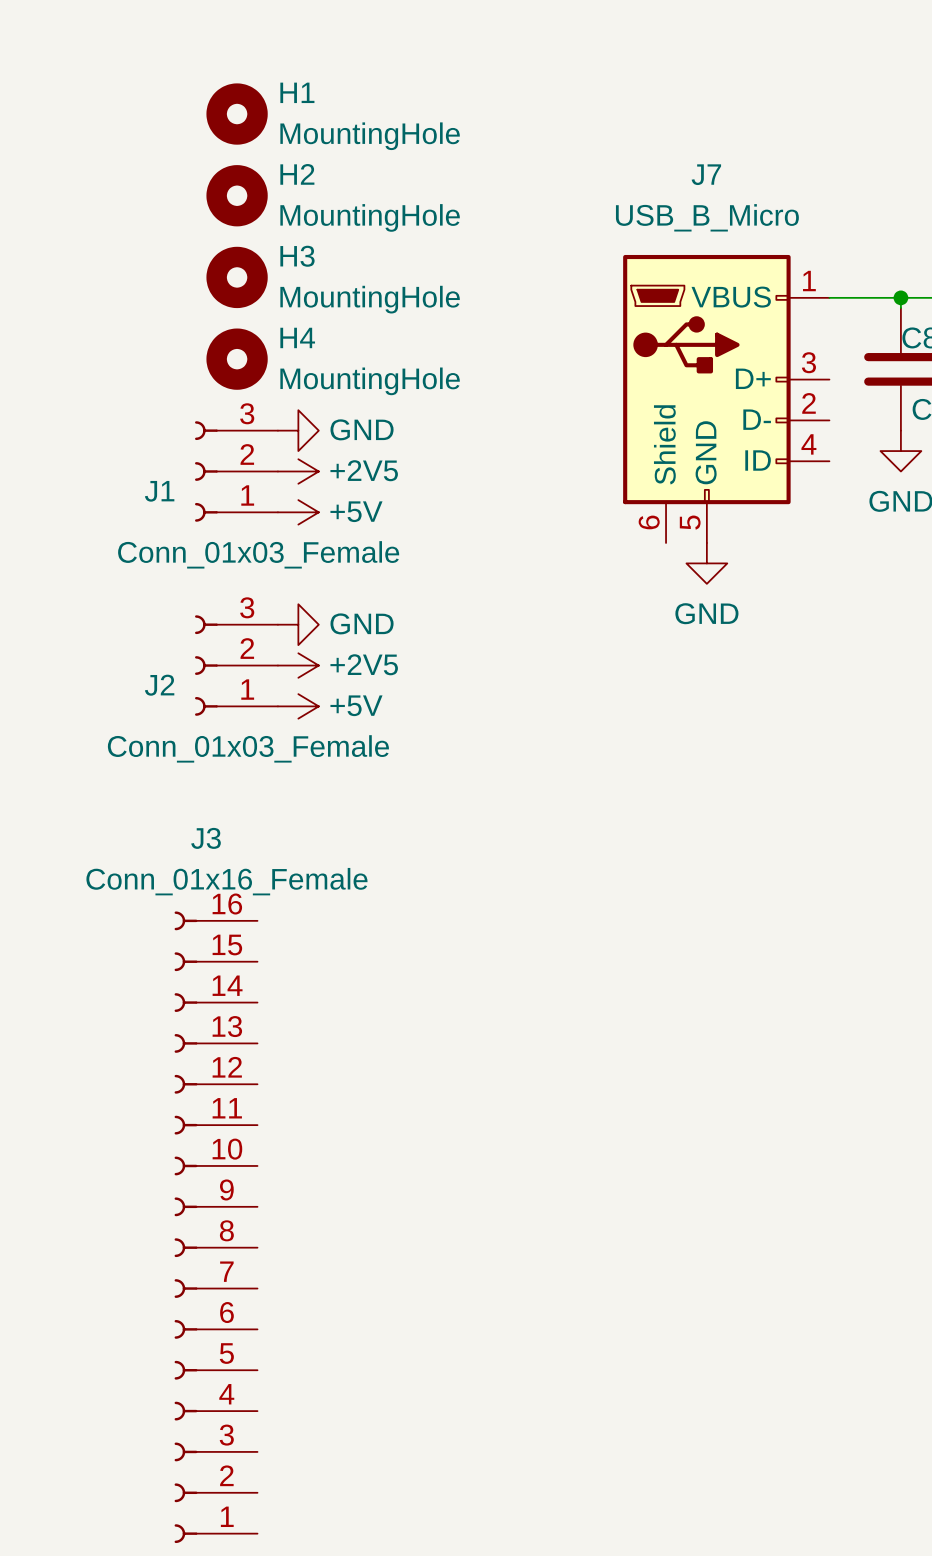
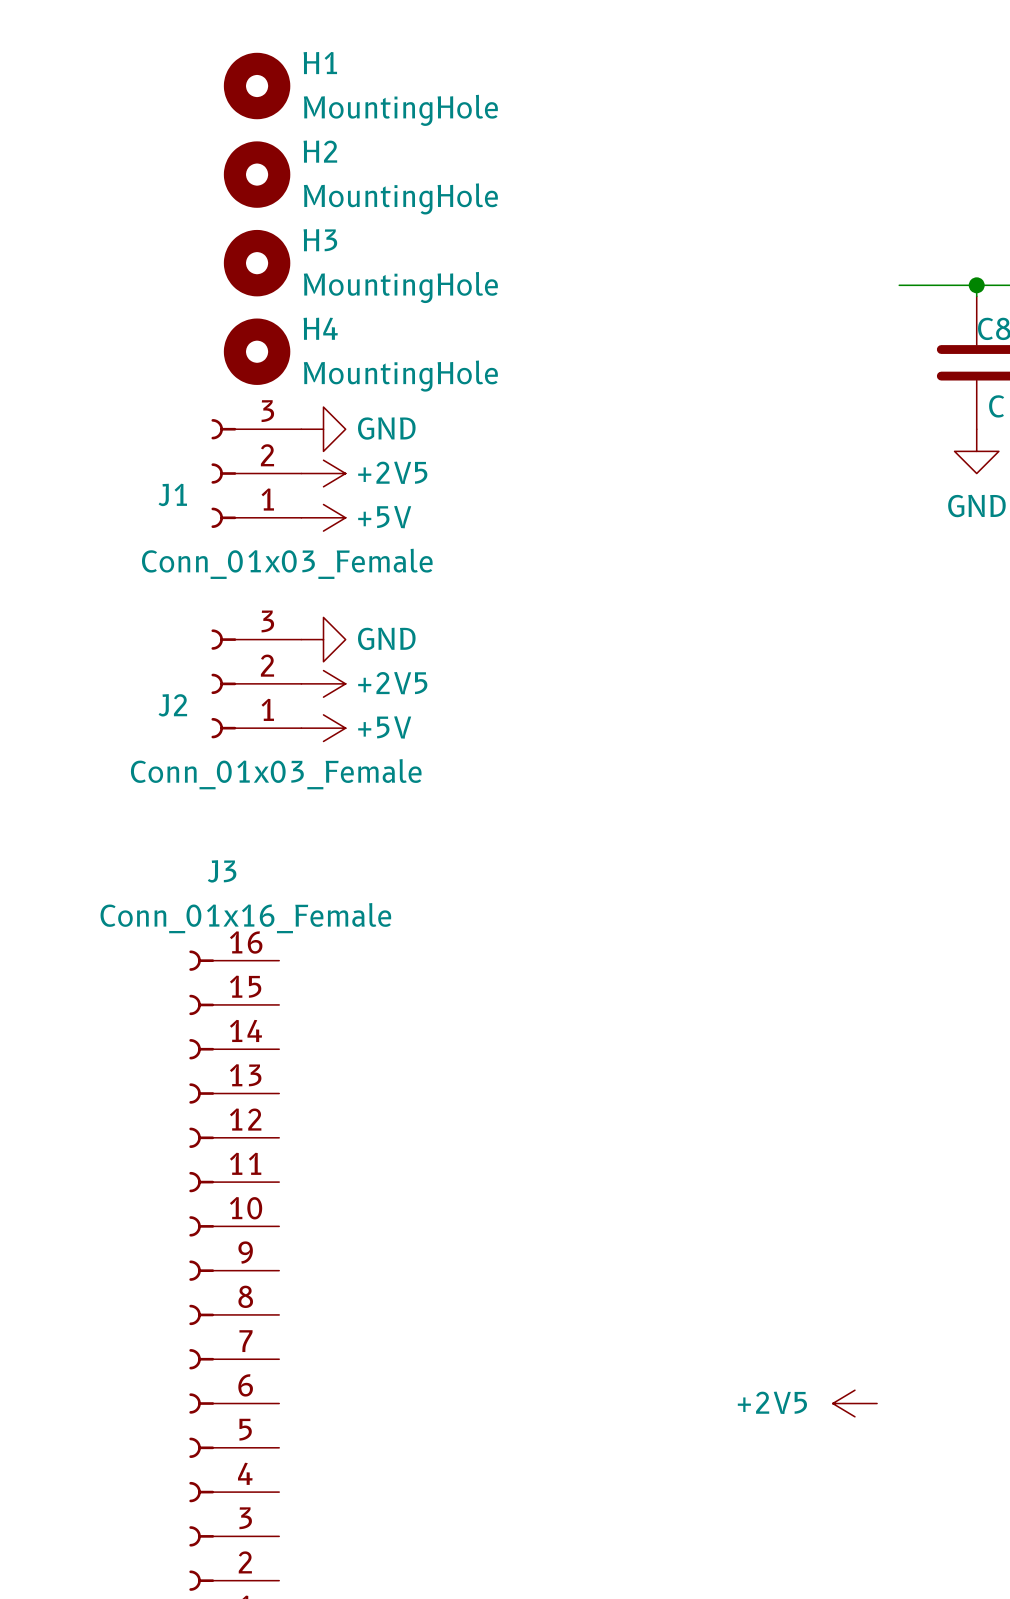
J7: USB_B_Micro (726, 398) -> none
power symbol: GND (706, 563) -> none
power symbol: none -> +2V5 (854, 1403)

